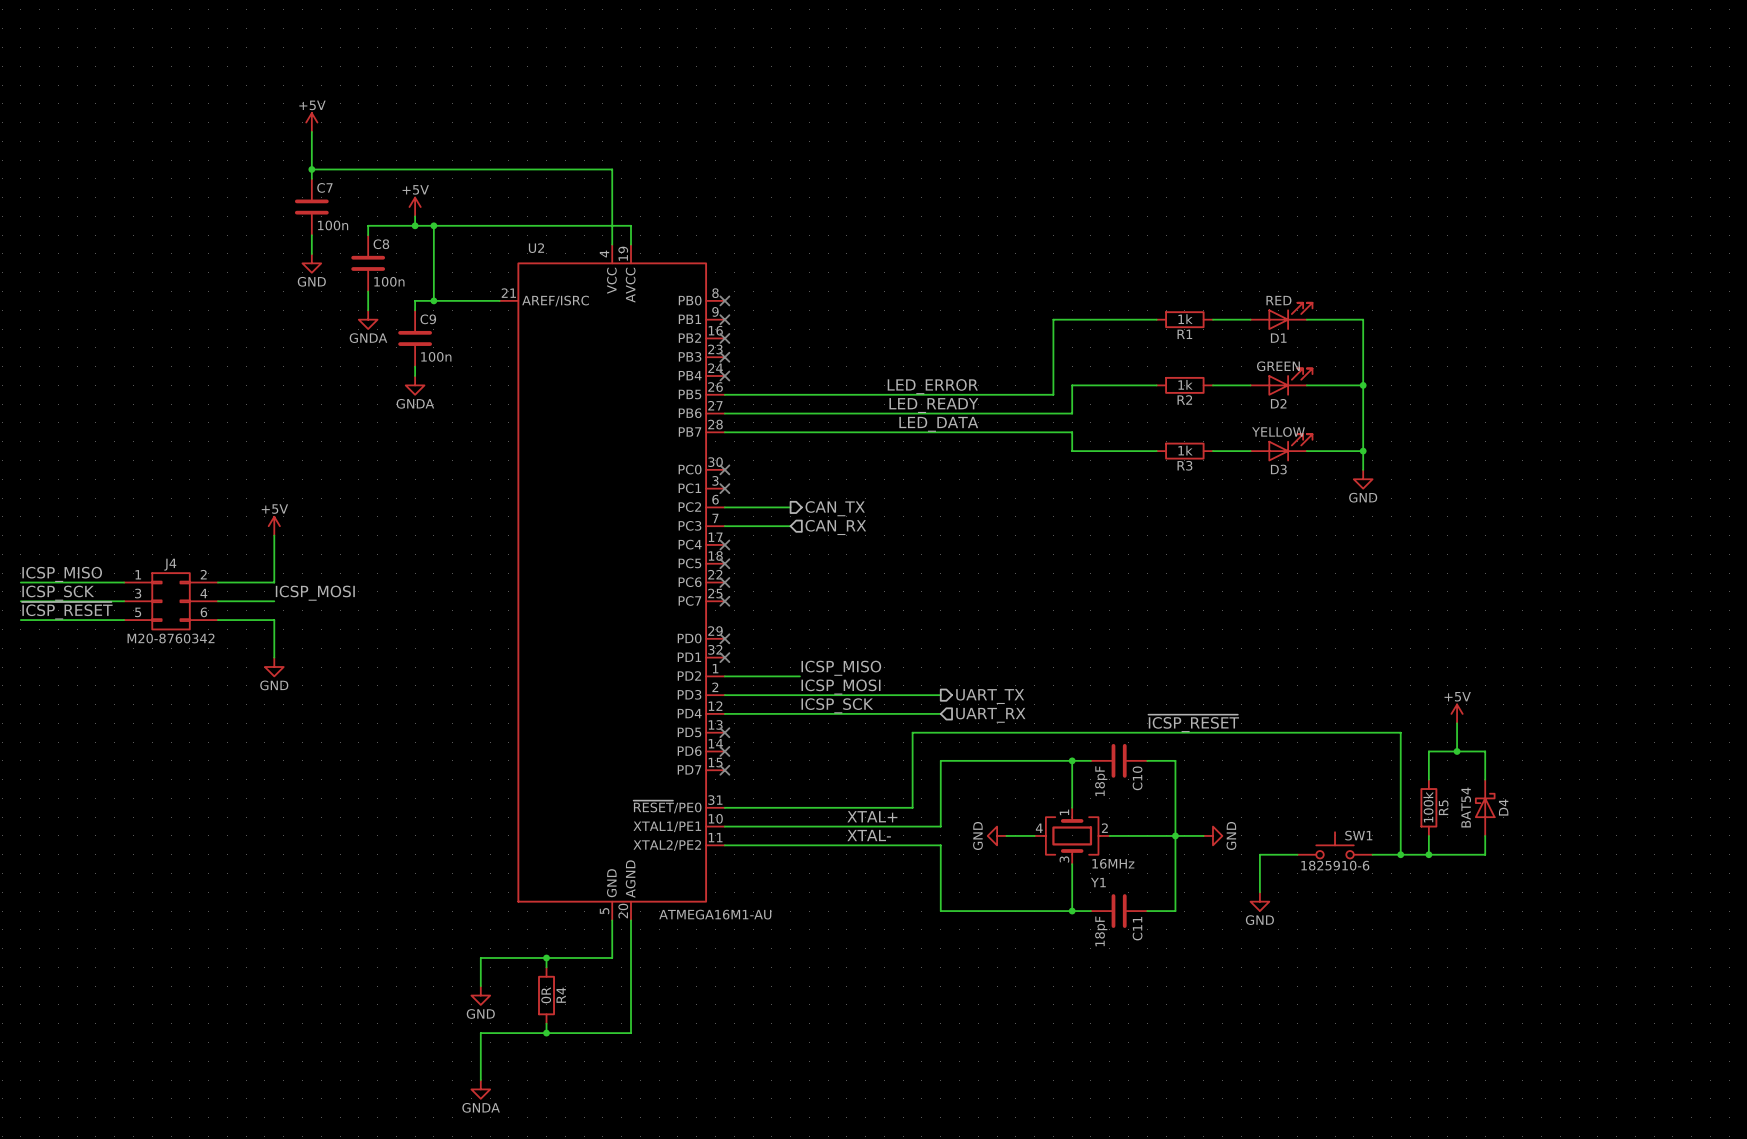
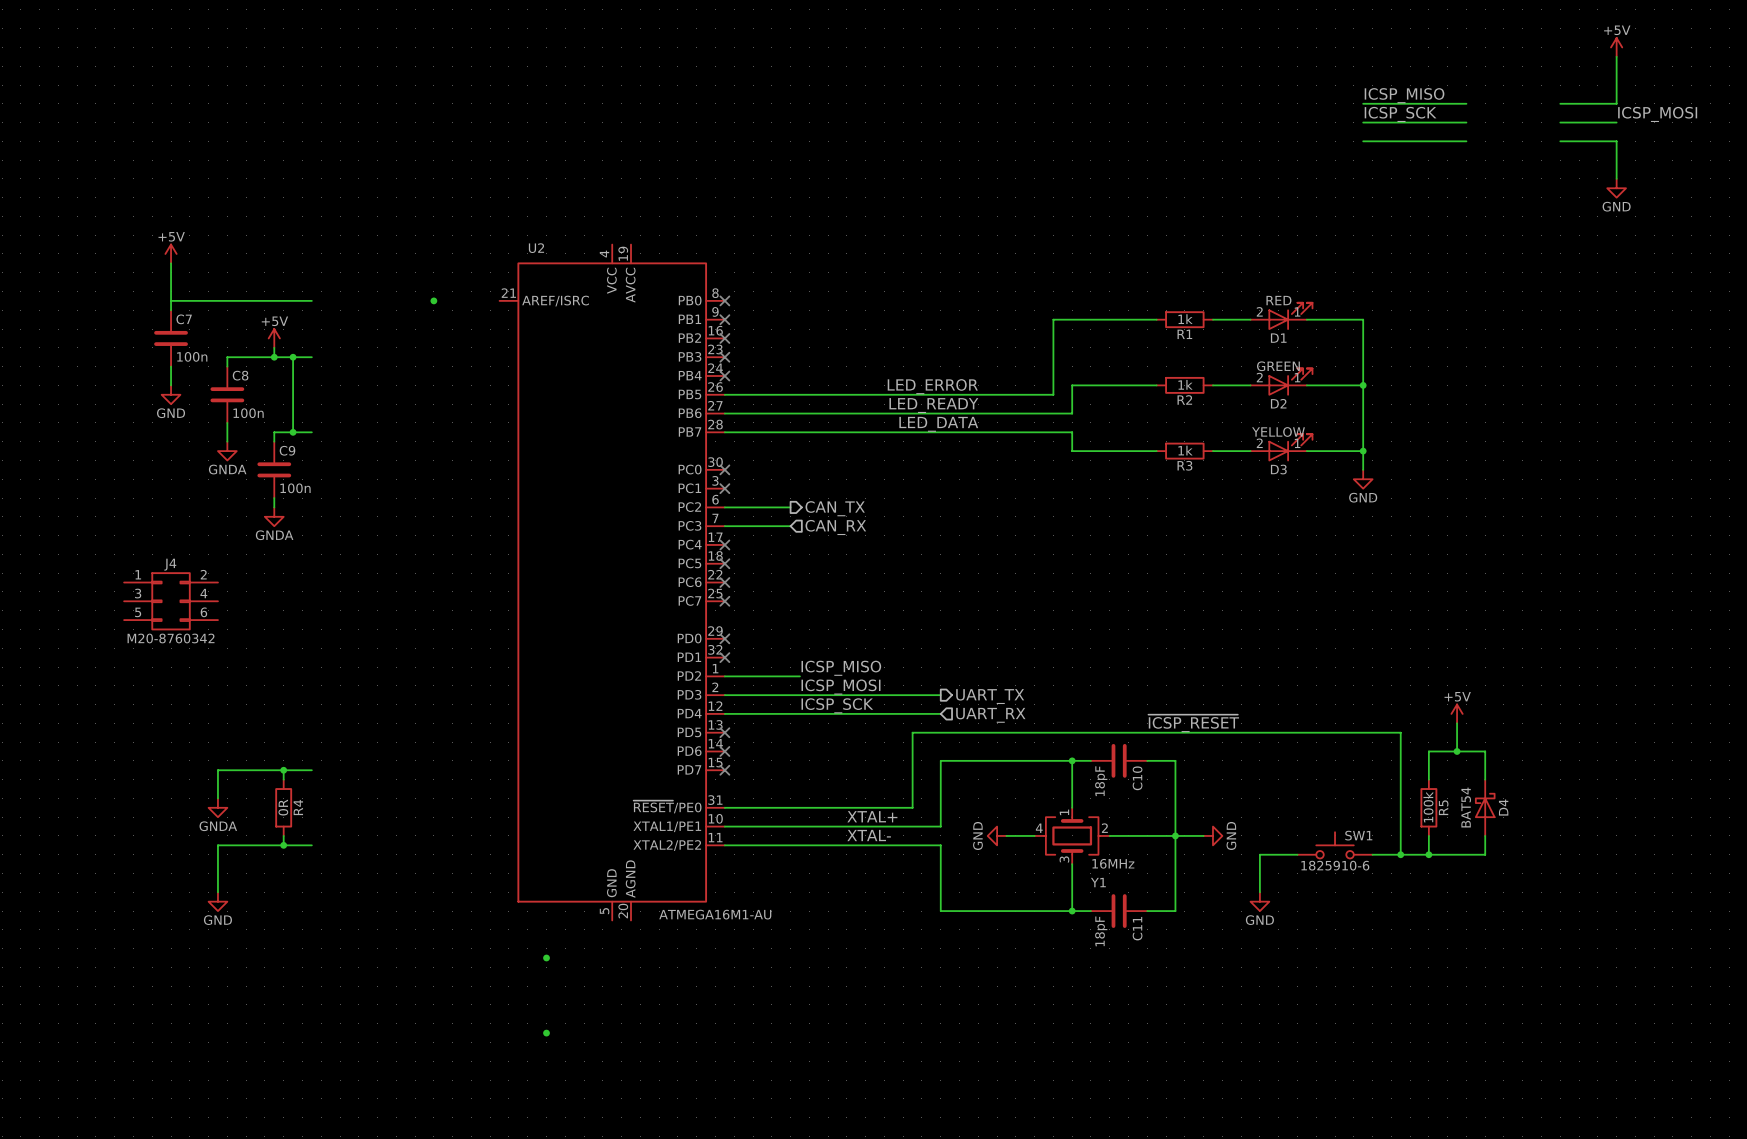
power symbol: none -> +5V (1616, 47)
wire: none -> (1616, 56) (1616, 103) (1560, 103)
label: none -> ICSP_MISO (1404, 95)
wire: none -> (1363, 103) (1466, 103)
label: none -> ICSP_SCK (1400, 114)
label: none -> ICSP_MOSI (1657, 114)
power symbol: +5V (311, 122) -> none
wire: none -> (1363, 122) (1466, 122)
wire: none -> (1560, 122) (1616, 122)
wire: (311, 131) (311, 178) -> none
wire: none -> (1363, 141) (1466, 141)
wire: none -> (1560, 141) (1616, 141) (1616, 178)
wire: (311, 169) (612, 169) (612, 244) -> none
junction: (311, 169) -> none
power symbol: none -> GND (1616, 188)
C7 position: (311, 207) -> (171, 338)
power symbol: +5V (415, 207) -> none
wire: (415, 216) (415, 225) -> none
junction: (415, 225) -> none
wire: (433, 225) (433, 300) -> none
junction: (433, 225) -> none
wire: (311, 235) (311, 253) -> none
wire: (368, 235) (368, 225) (631, 225) (631, 244) -> none
power symbol: none -> +5V (171, 253)
wire: none -> (171, 263) (171, 310)
power symbol: GND (311, 263) -> none
C8 position: (368, 263) -> (227, 394)
wire: (368, 291) (368, 310) -> none
wire: none -> (171, 300) (311, 300)
wire: (499, 300) (415, 300) (415, 310) -> none
D1 pin number: none -> 2 (1259, 311)
D1 pin number: none -> 1 (1297, 311)
power symbol: GNDA (368, 319) -> none
power symbol: none -> +5V (274, 338)
C9 position: (415, 338) -> (274, 469)
junction: none -> (274, 357)
wire: none -> (293, 357) (293, 432)
junction: none -> (293, 357)
wire: none -> (311, 357) (227, 357) (227, 366)
wire: none -> (171, 366) (171, 385)
wire: (415, 366) (415, 376) -> (274, 347) (274, 357)
D2 pin number: none -> 2 (1259, 377)
D2 pin number: none -> 1 (1297, 377)
power symbol: GNDA (415, 385) -> none
power symbol: none -> GND (171, 394)
wire: none -> (227, 422) (227, 441)
junction: none -> (293, 432)
wire: none -> (311, 432) (274, 432) (274, 441)
D3 pin number: none -> 2 (1259, 443)
D3 pin number: none -> 1 (1297, 443)
power symbol: none -> GNDA (227, 451)
wire: none -> (274, 498) (274, 507)
power symbol: none -> GNDA (274, 516)
power symbol: +5V (274, 526) -> none
wire: (274, 535) (274, 582) (217, 582) -> none
label: ICSP_MISO (62, 574) -> none
wire: (20, 582) (124, 582) -> none
label: ICSP_SCK (58, 593) -> none
label: ICSP_MOSI (315, 593) -> none
wire: (20, 601) (124, 601) -> none
wire: (217, 601) (274, 601) -> none
label: ~{ICSP_RESET} (67, 610) -> none
wire: (20, 620) (124, 620) -> none
wire: (217, 620) (274, 620) (274, 657) -> none
power symbol: GND (274, 667) -> none
wire: none -> (283, 770) (283, 779)
junction: none -> (283, 770)
wire: none -> (311, 770) (217, 770) (217, 798)
power symbol: none -> GNDA (217, 807)
wire: none -> (283, 835) (283, 845)
junction: none -> (283, 845)
wire: none -> (311, 845) (217, 845) (217, 892)
power symbol: none -> GND (217, 901)
wire: (612, 920) (612, 957) (480, 957) (480, 986) -> none
wire: (631, 920) (631, 1033) (480, 1033) (480, 1080) -> none
wire: (546, 957) (546, 967) -> none
power symbol: GND (480, 995) -> none
R4 position: (546, 995) -> (283, 807)
wire: (546, 1023) (546, 1033) -> none
power symbol: GNDA (480, 1089) -> none

